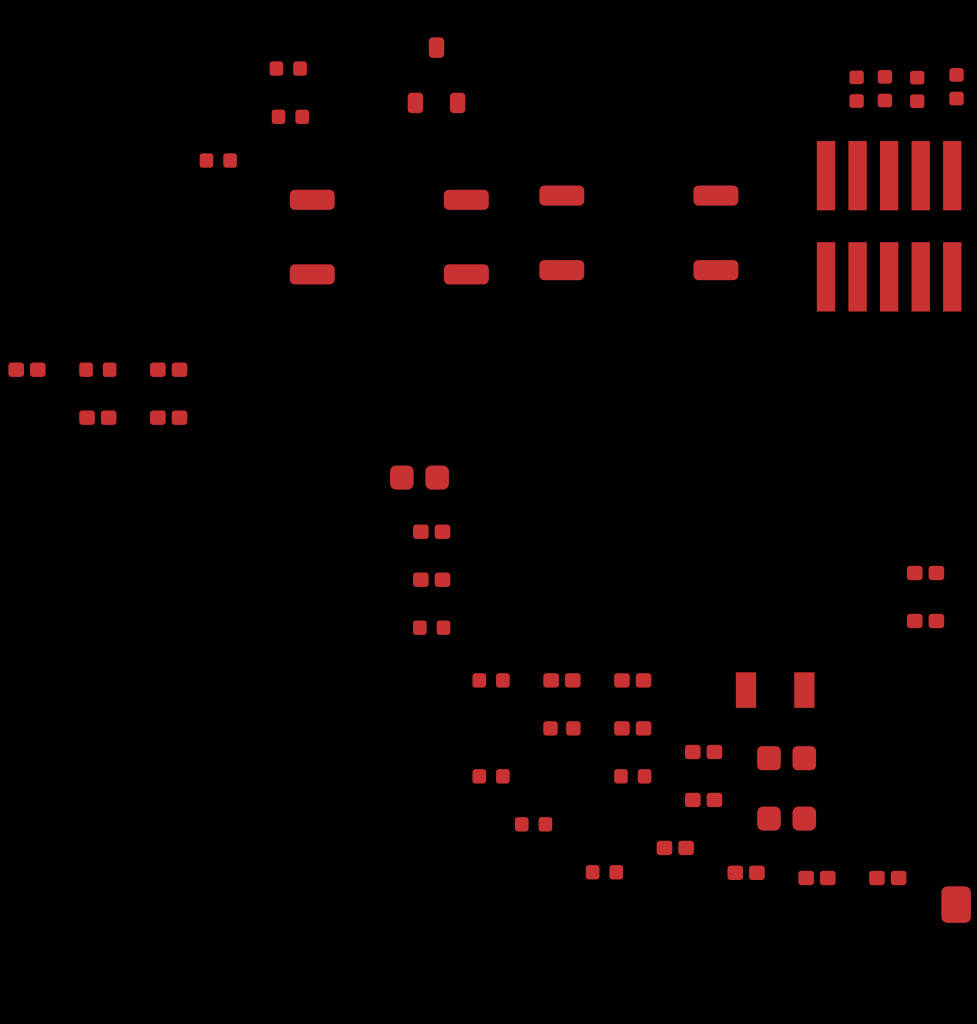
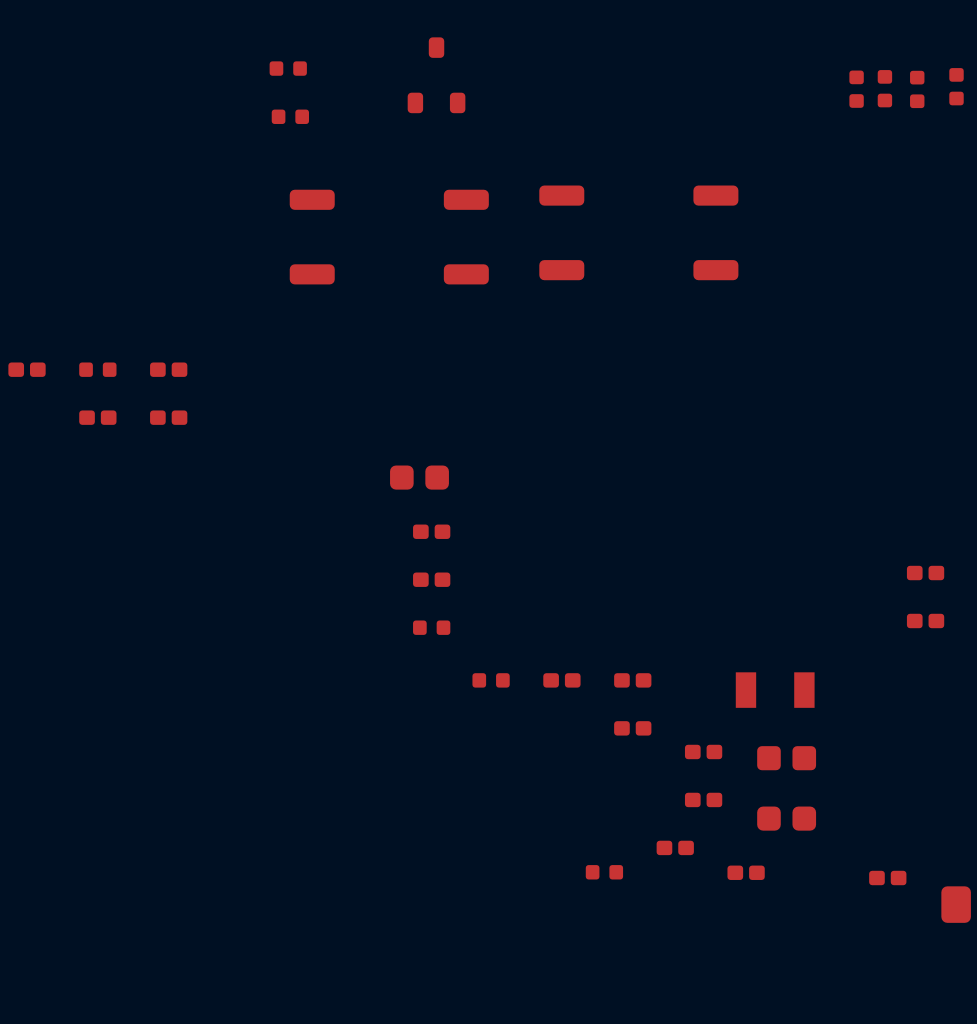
part: (218, 160) -> none
part: (889, 226) -> none
part: (561, 728) -> none
part: (491, 776) -> none
part: (632, 776) -> none
part: (533, 824) -> none
part: (816, 878) -> none

